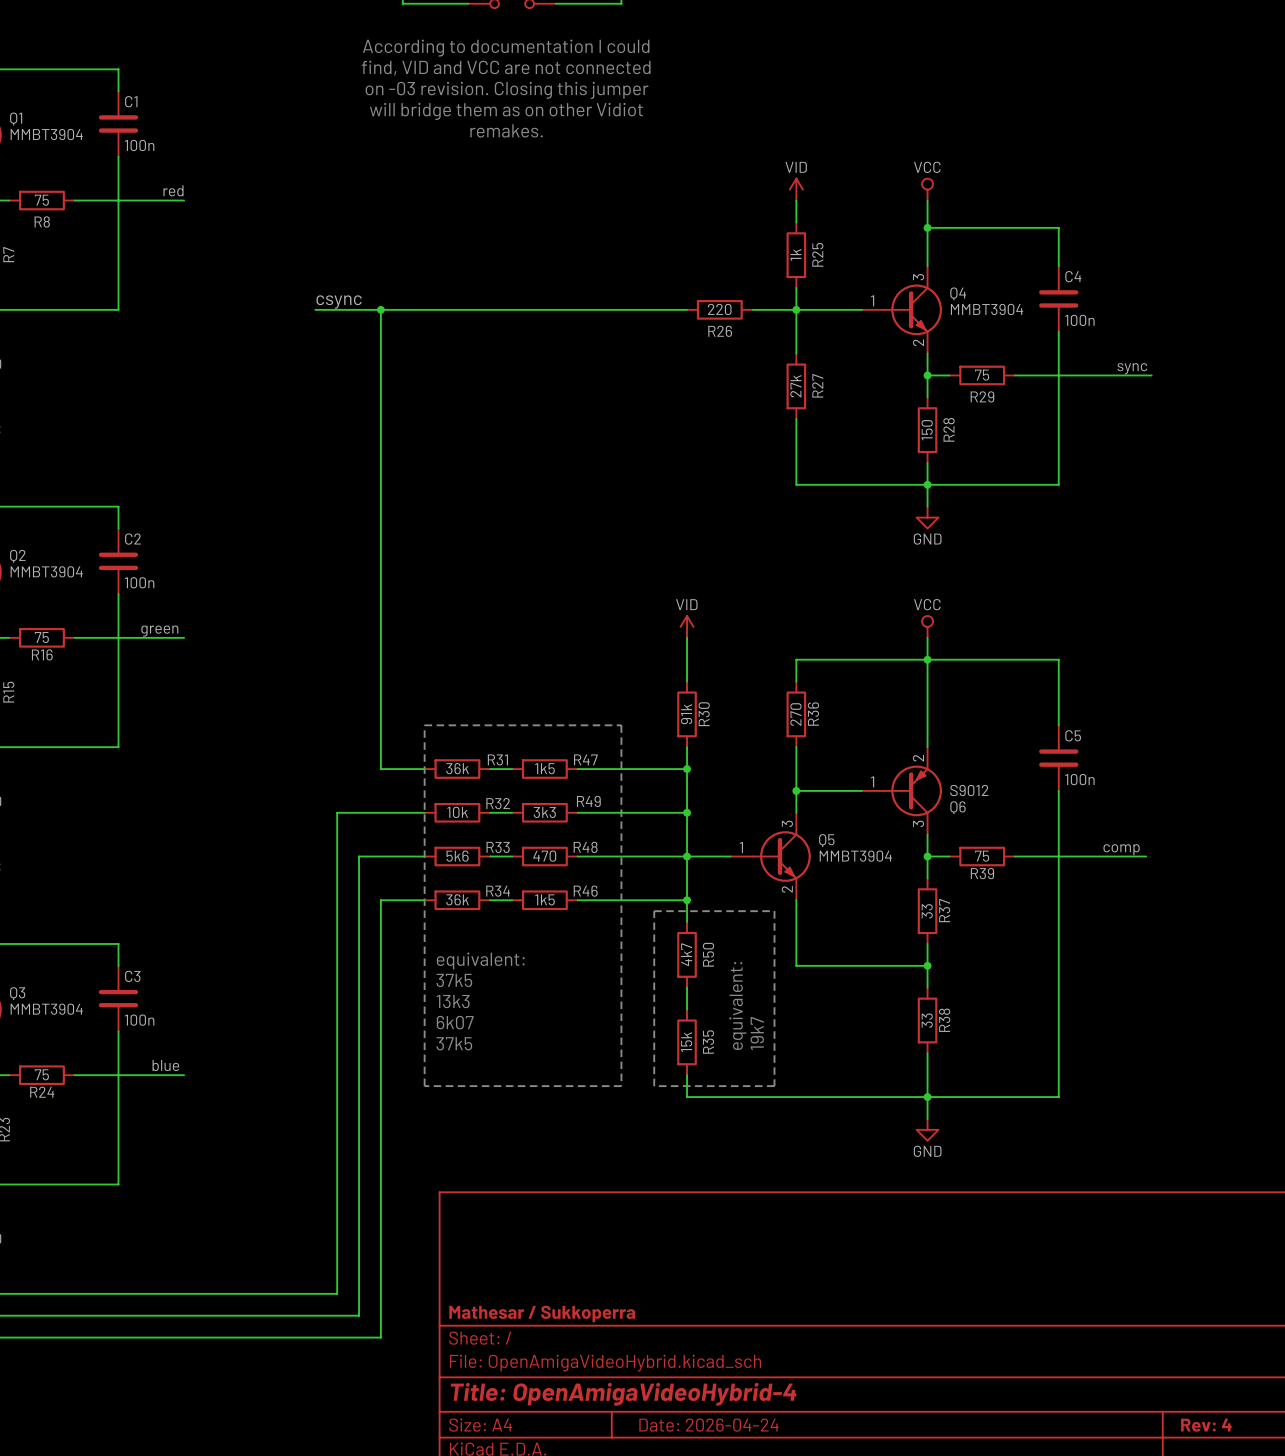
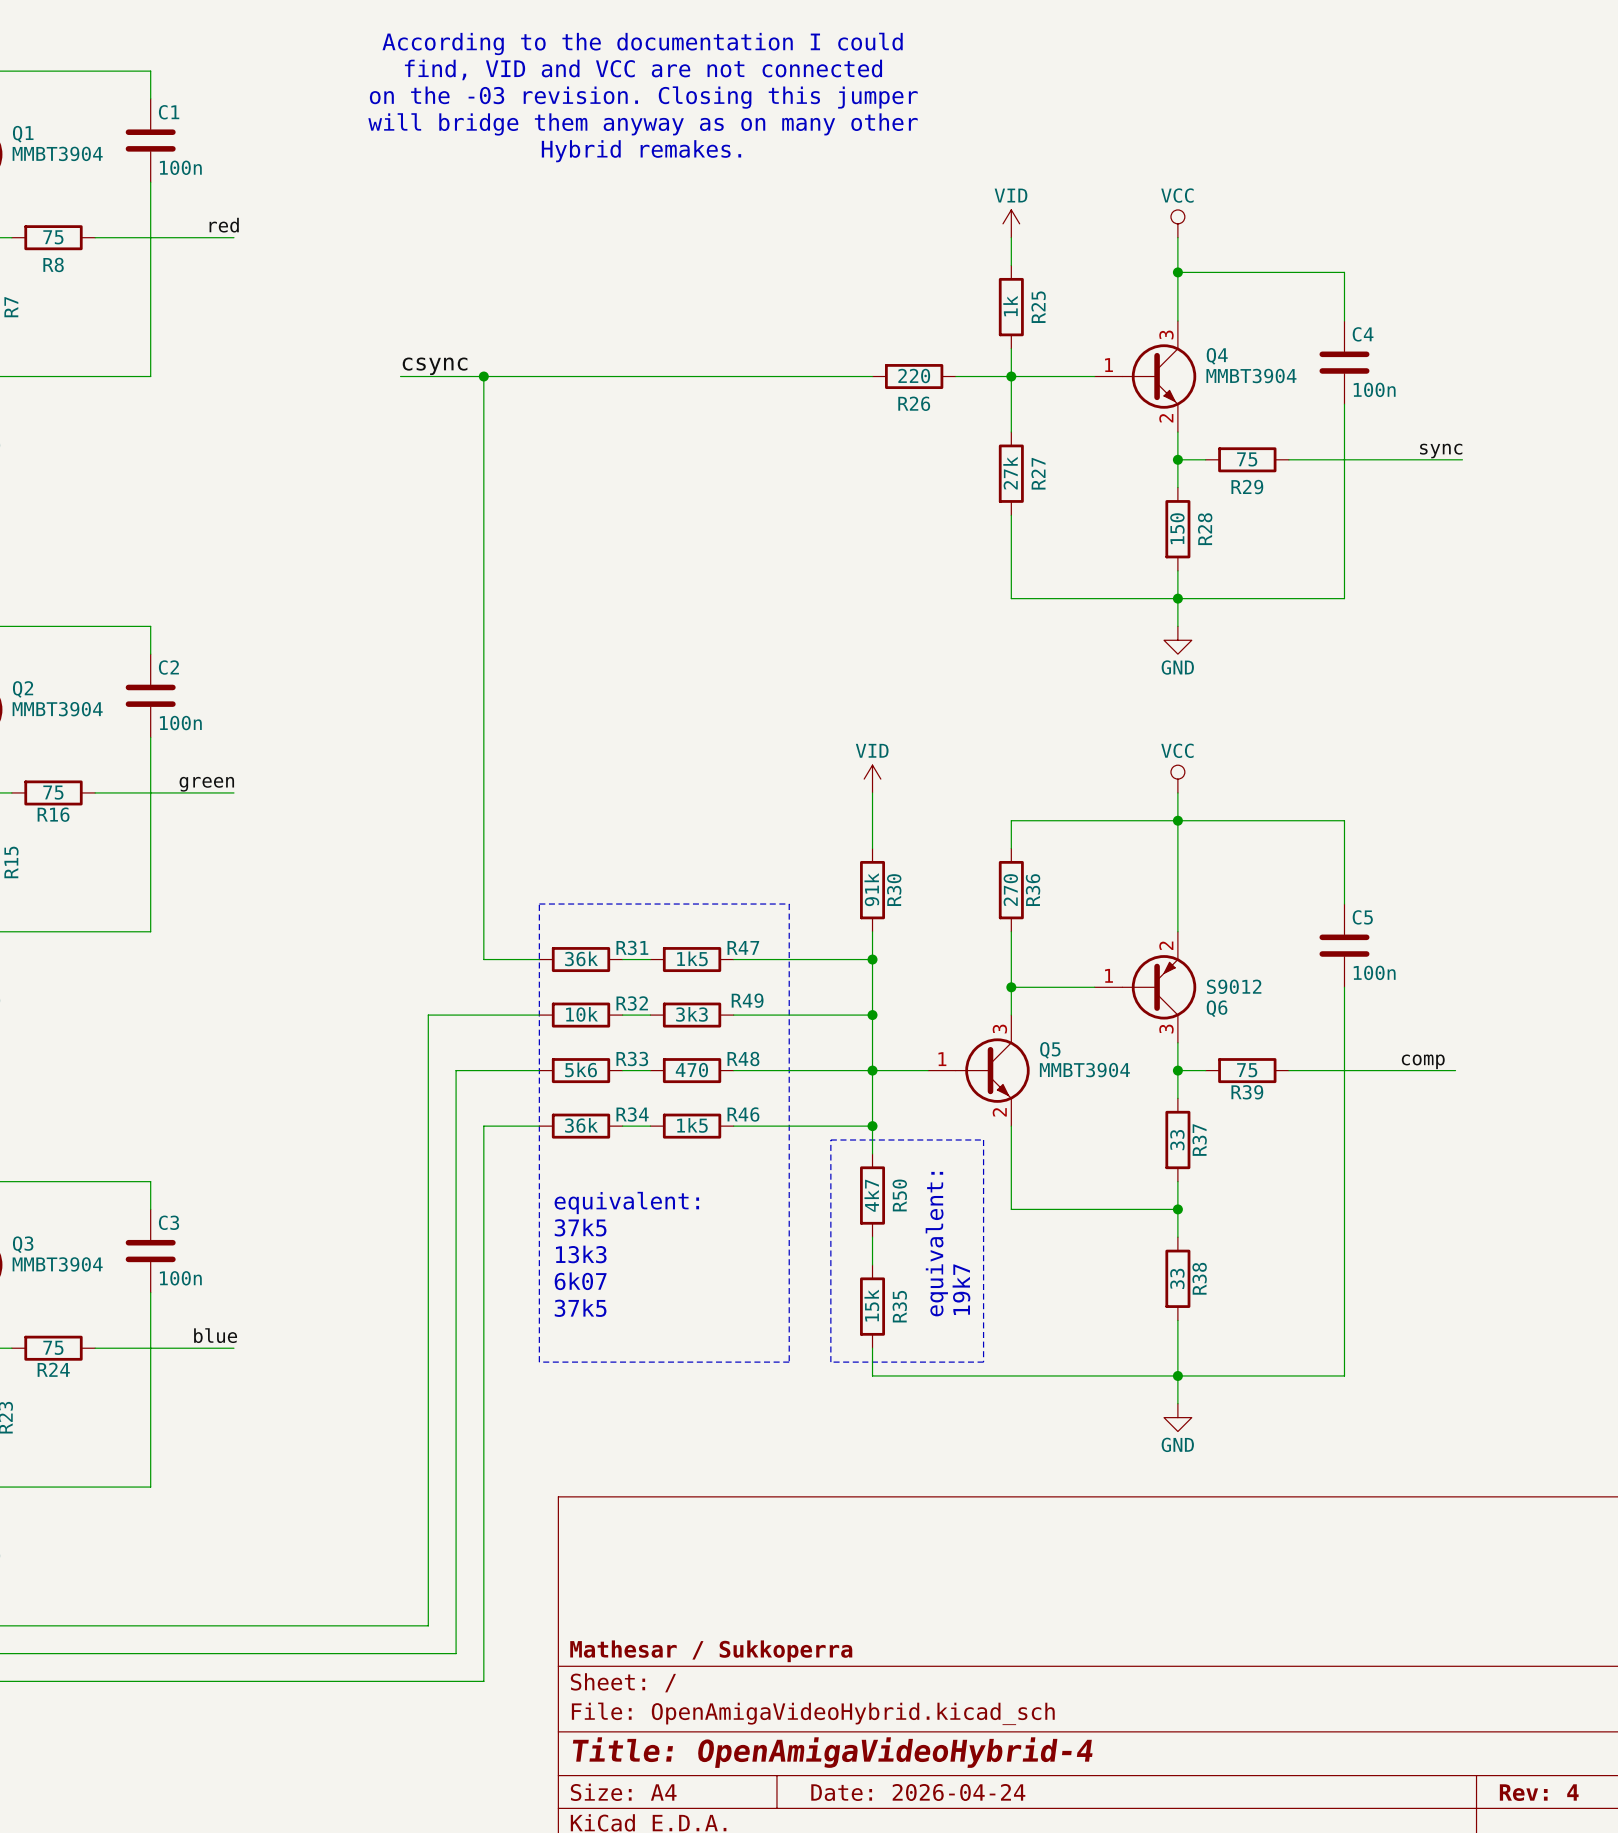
text: According to documentation I could (506, 48) -> According to the documentation I could (642, 43)
text: on -03 revision. Closing this jumper (507, 90) -> on the -03 revision. Closing this jumper (643, 97)
text: will bridge them as on other Vidiot (506, 111) -> will bridge them anyway as on many other (643, 124)
text: remakes. (506, 130) -> Hybrid remakes. (641, 151)

